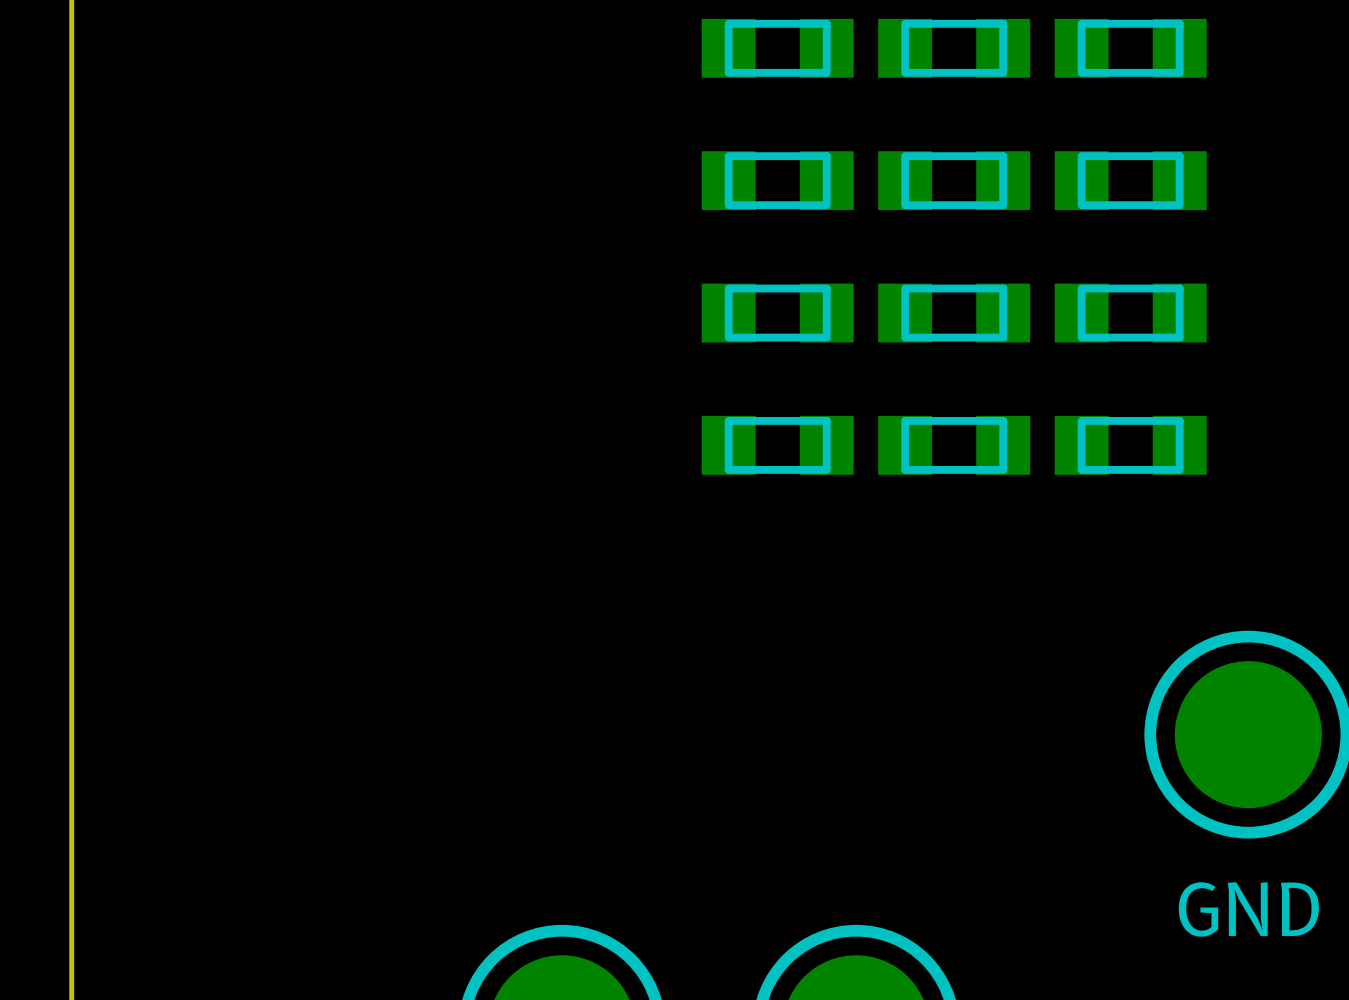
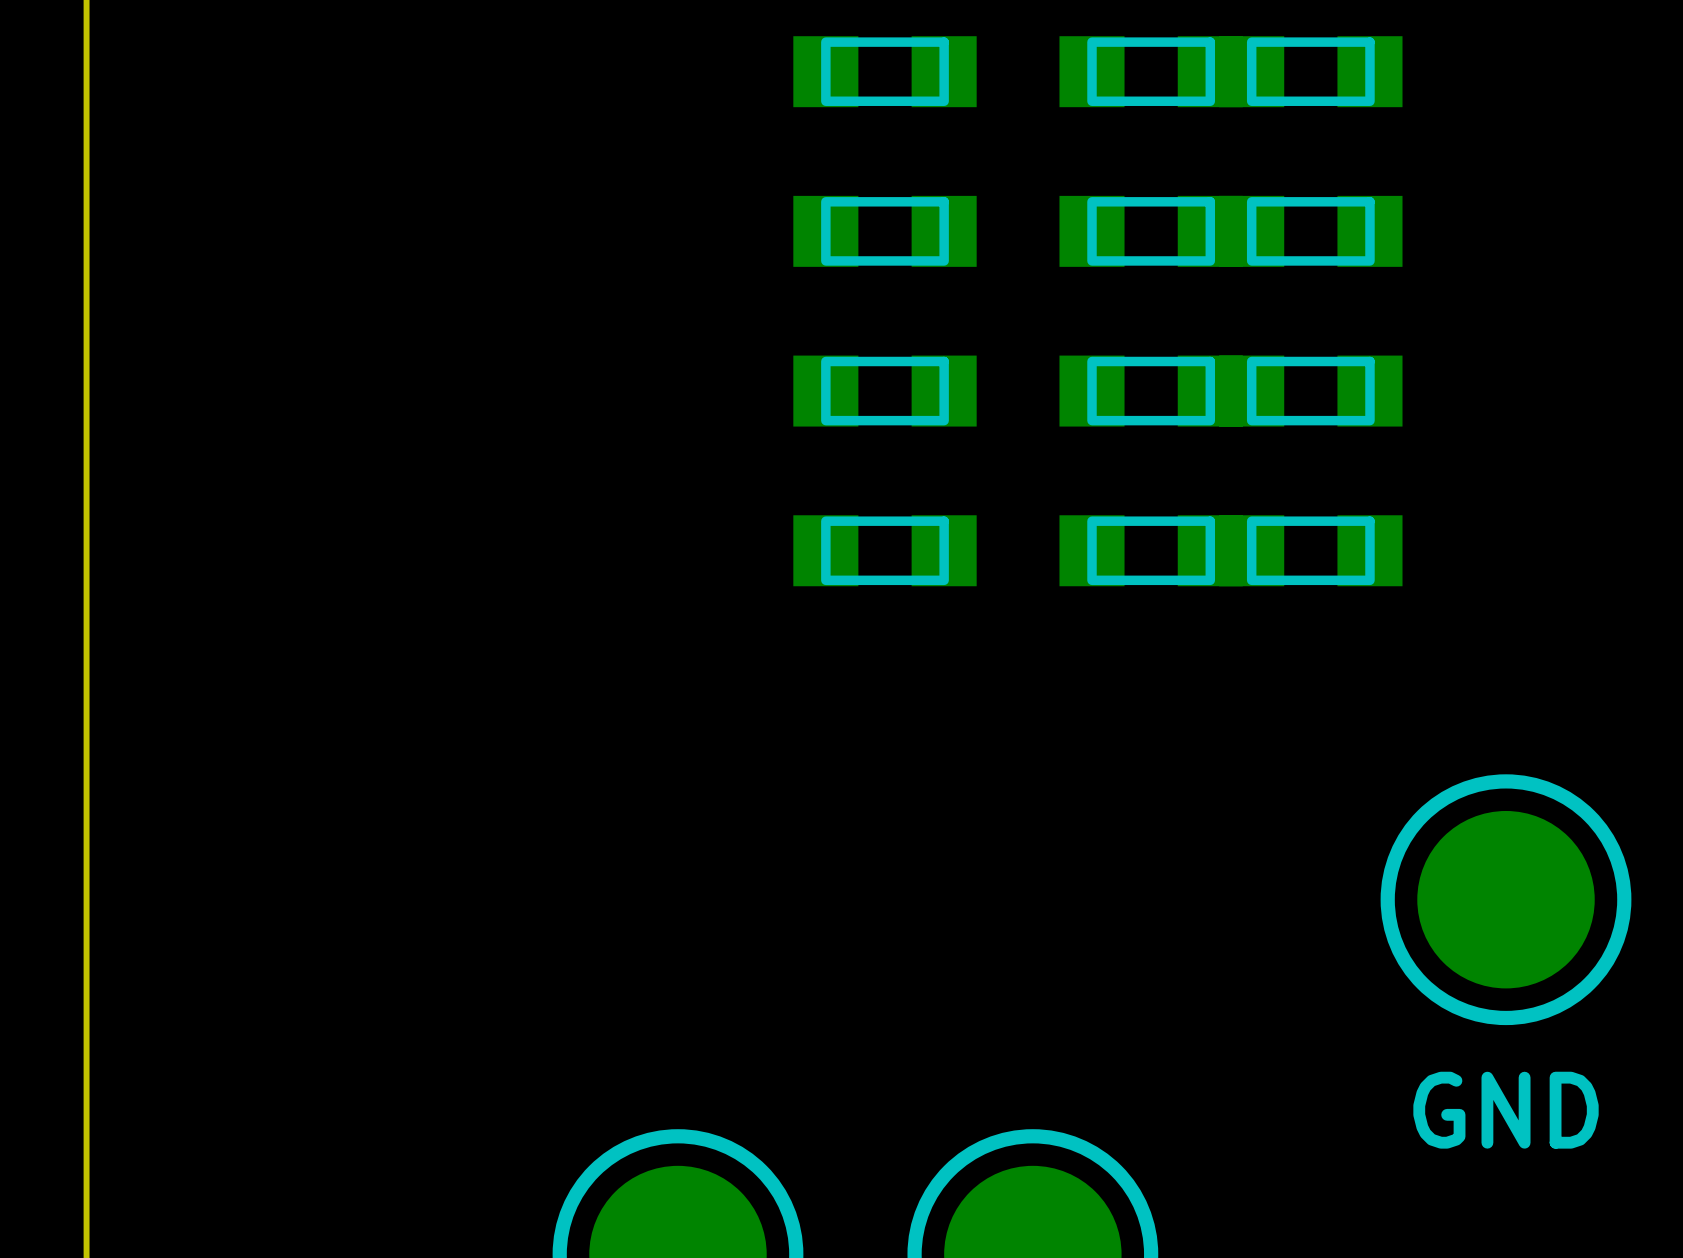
part position: (777, 48) -> (885, 71)
part position: (1130, 48) -> (1310, 71)
part position: (777, 180) -> (885, 231)
part position: (1130, 180) -> (1310, 231)
part position: (777, 313) -> (885, 391)
part position: (1130, 313) -> (1310, 391)
part position: (777, 445) -> (885, 550)
part position: (1130, 445) -> (1310, 550)

